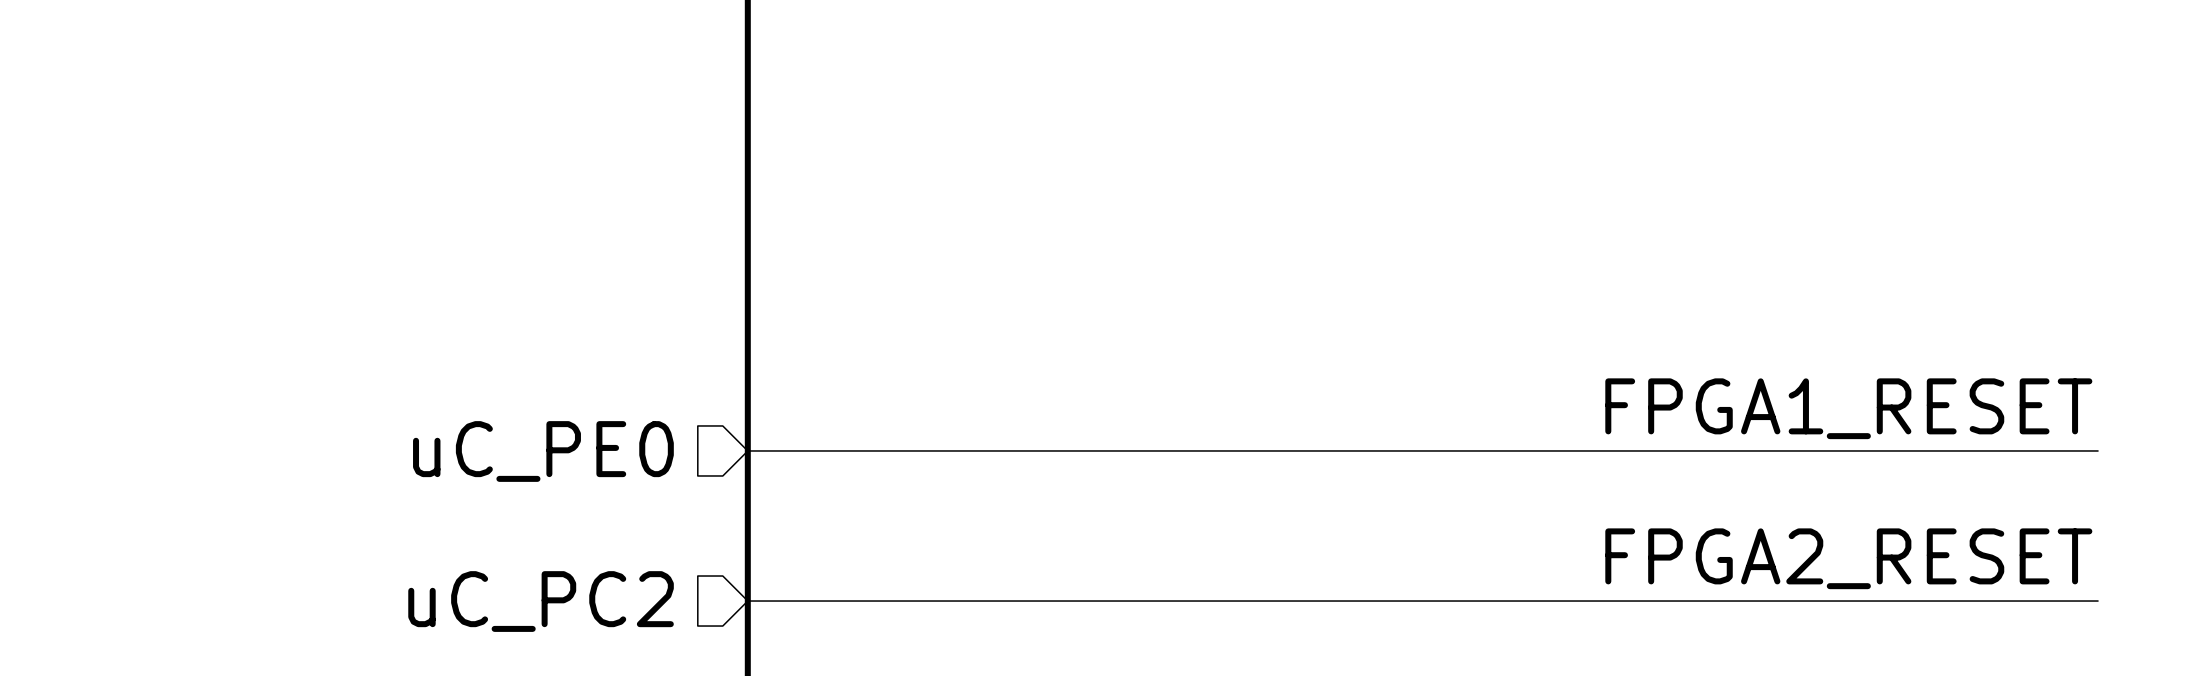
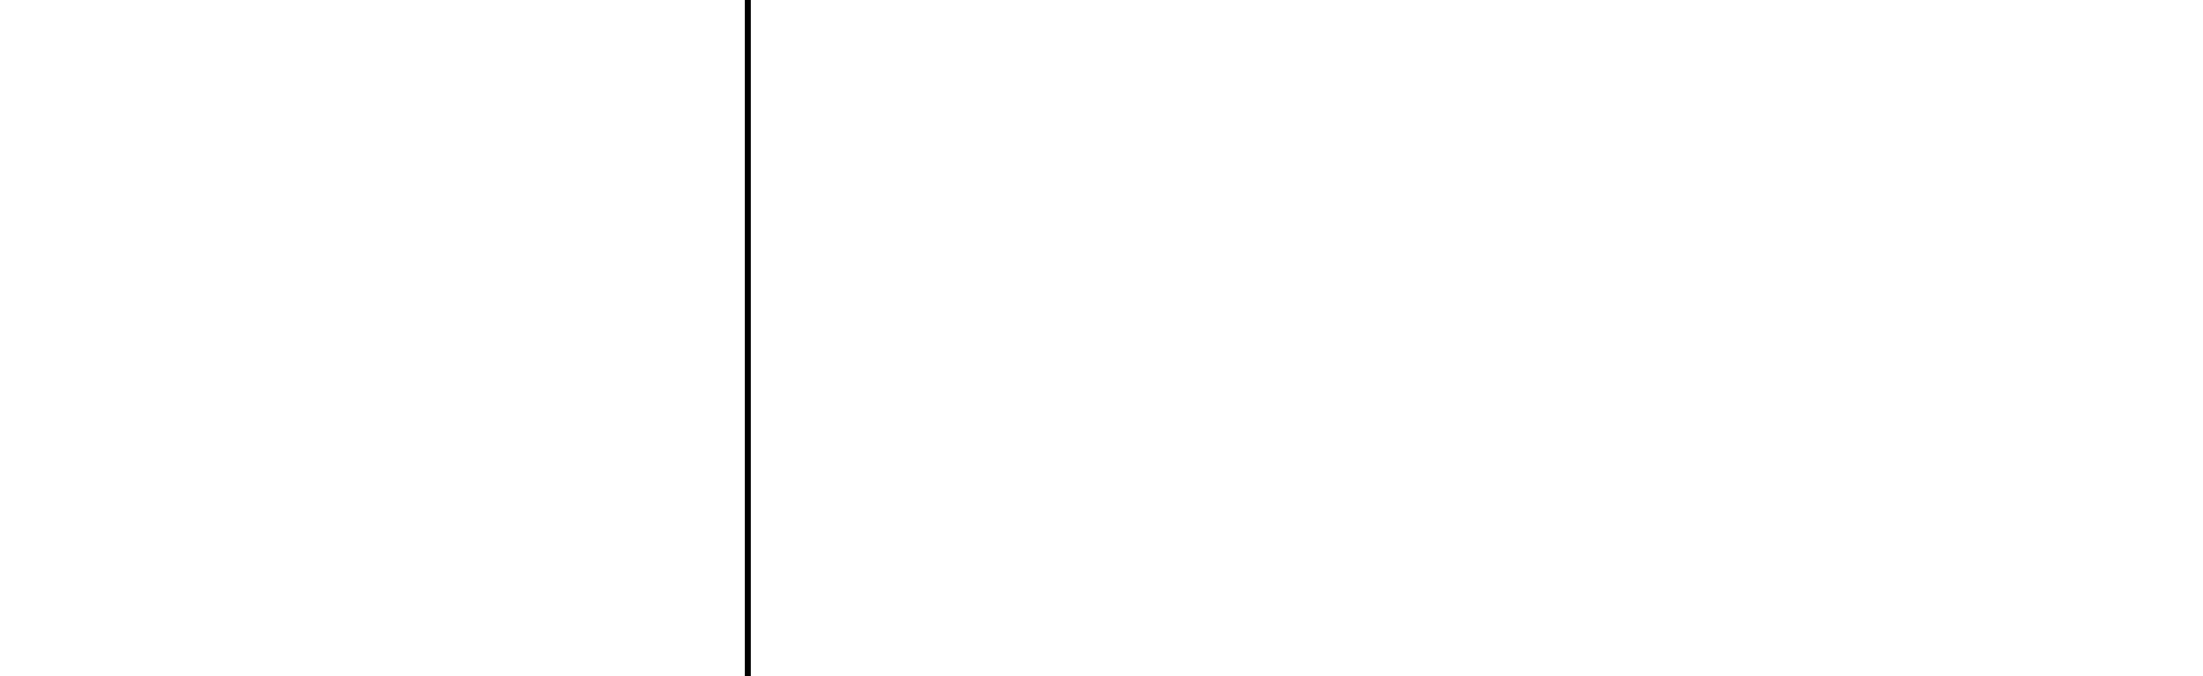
label: FPGA1_RESET (1848, 408) -> none
wire: (747, 450) (2098, 450) -> none
sheet pin: uC_PE0 (543, 451) -> none
label: FPGA2_RESET (1848, 558) -> none
sheet pin: uC_PC2 (541, 601) -> none
wire: (747, 601) (2098, 601) -> none

